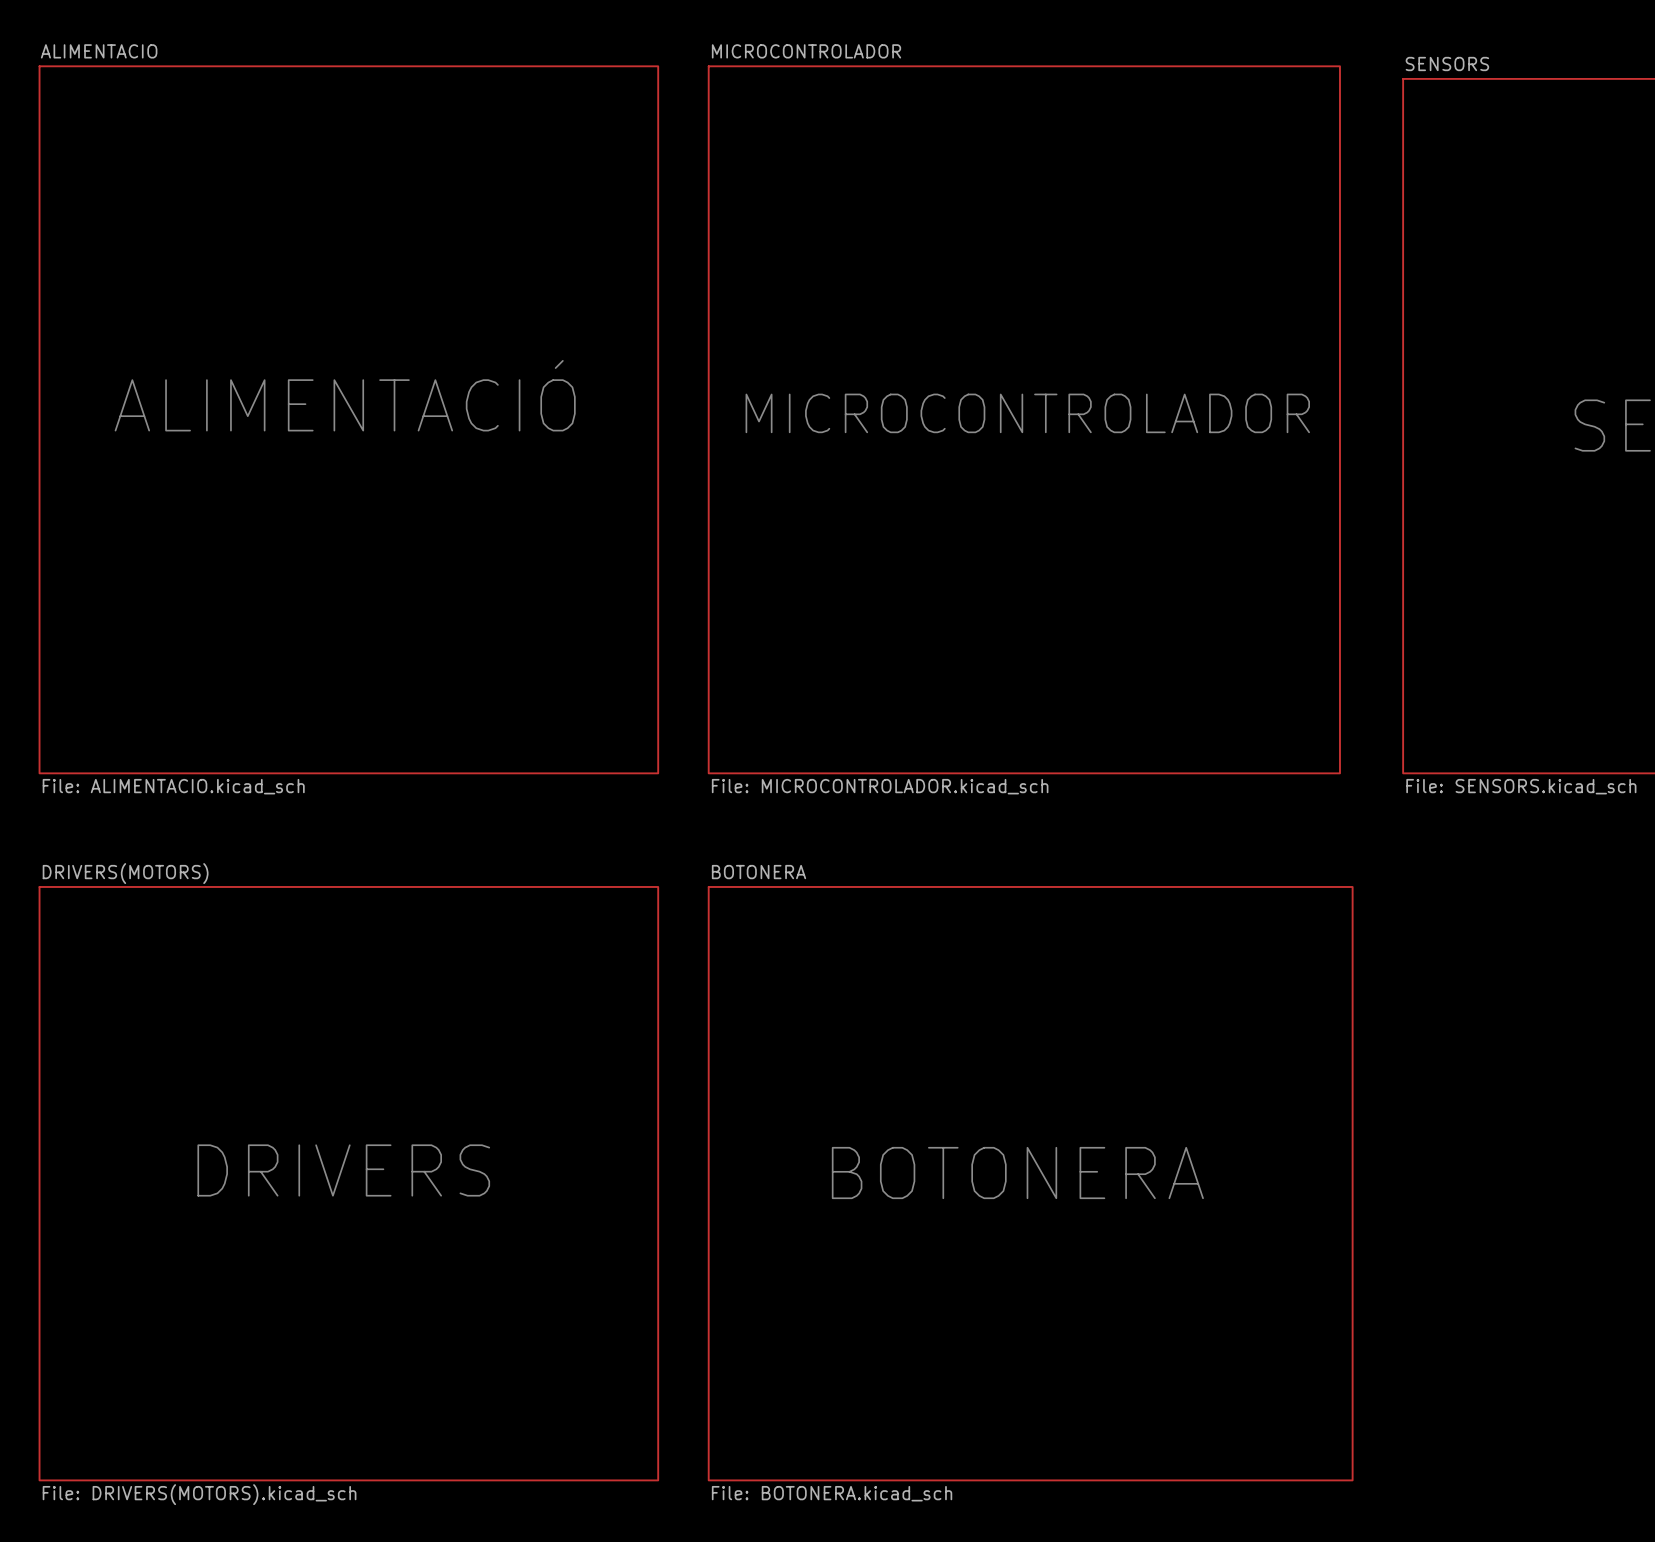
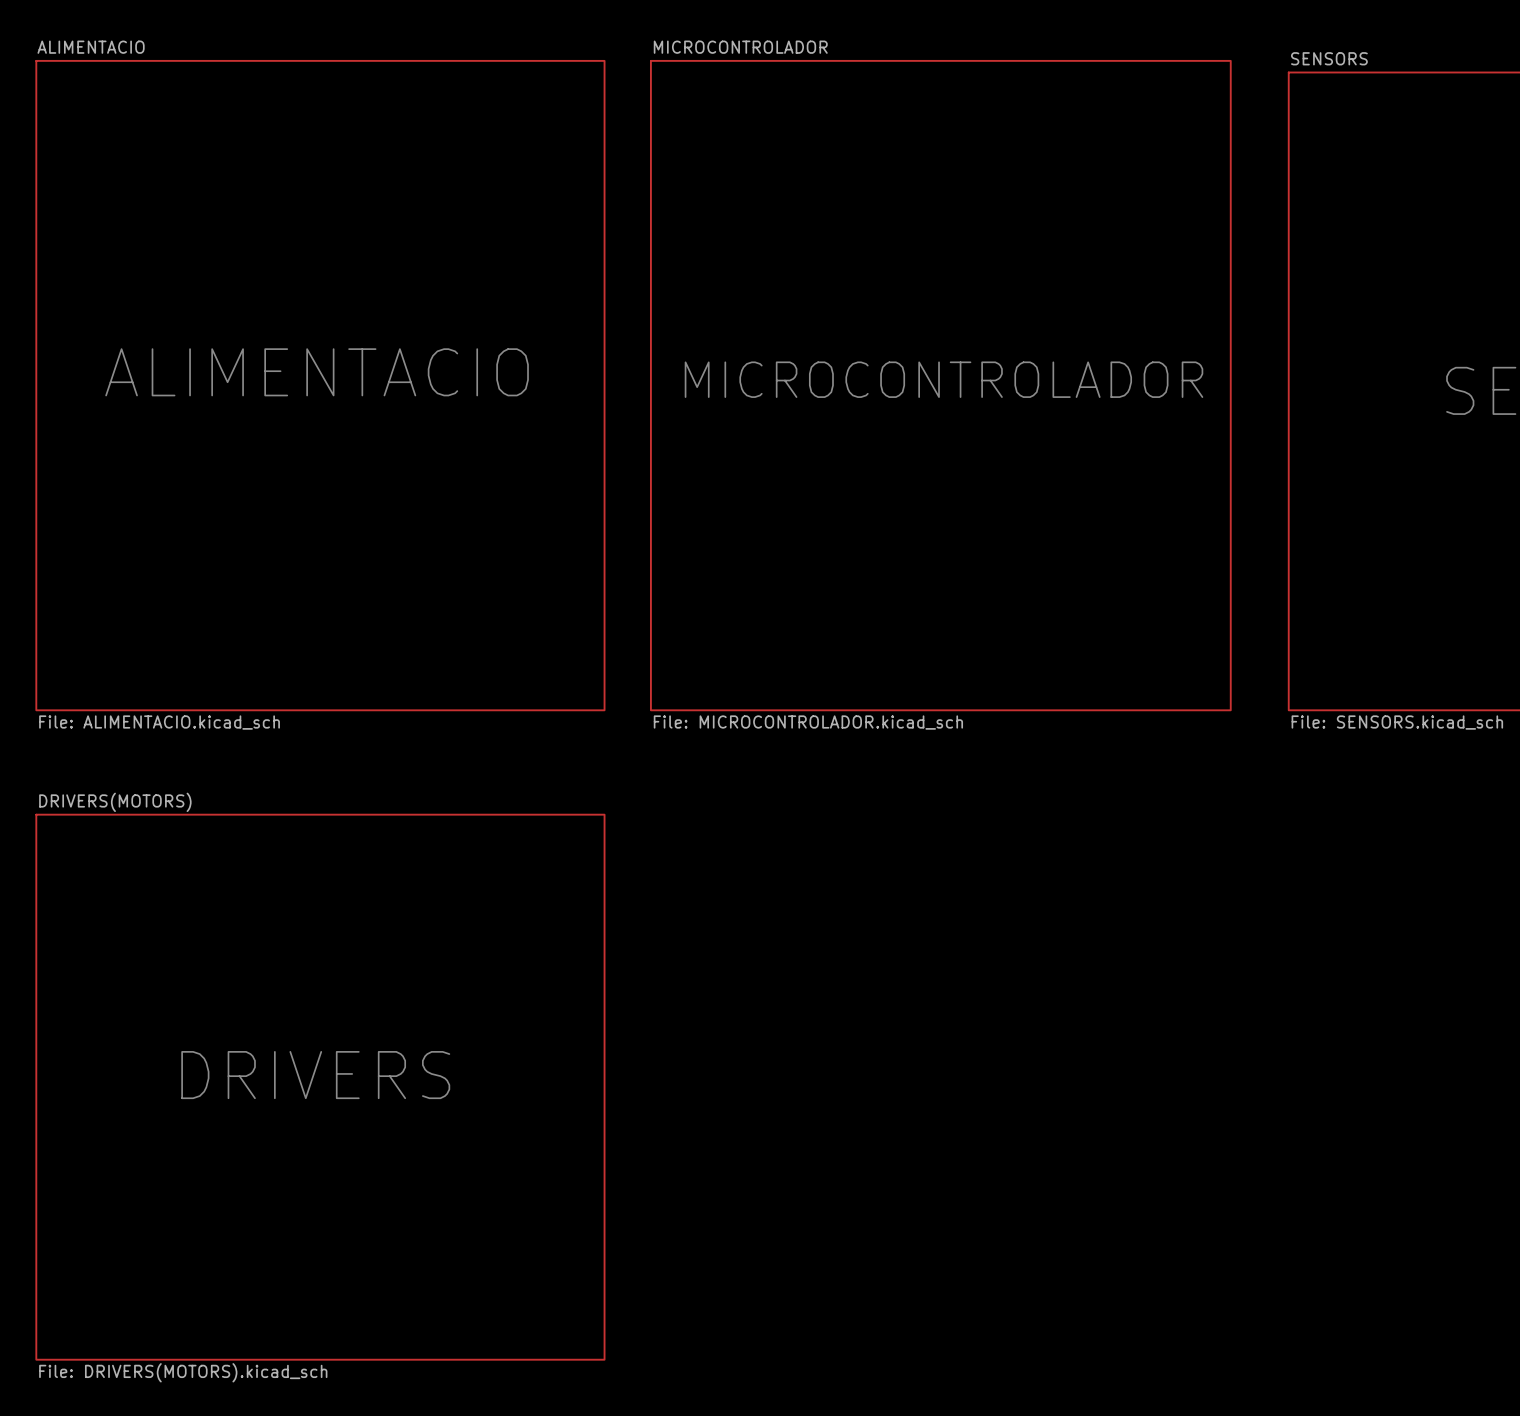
text: ALIMENTACIÓ (345, 395) -> ALIMENTACIO (317, 372)
text: BOTONERA (1017, 1173) -> none
sheet BOTONERA: File: BOTONERA.kicad_sch (1030, 1183) -> none

